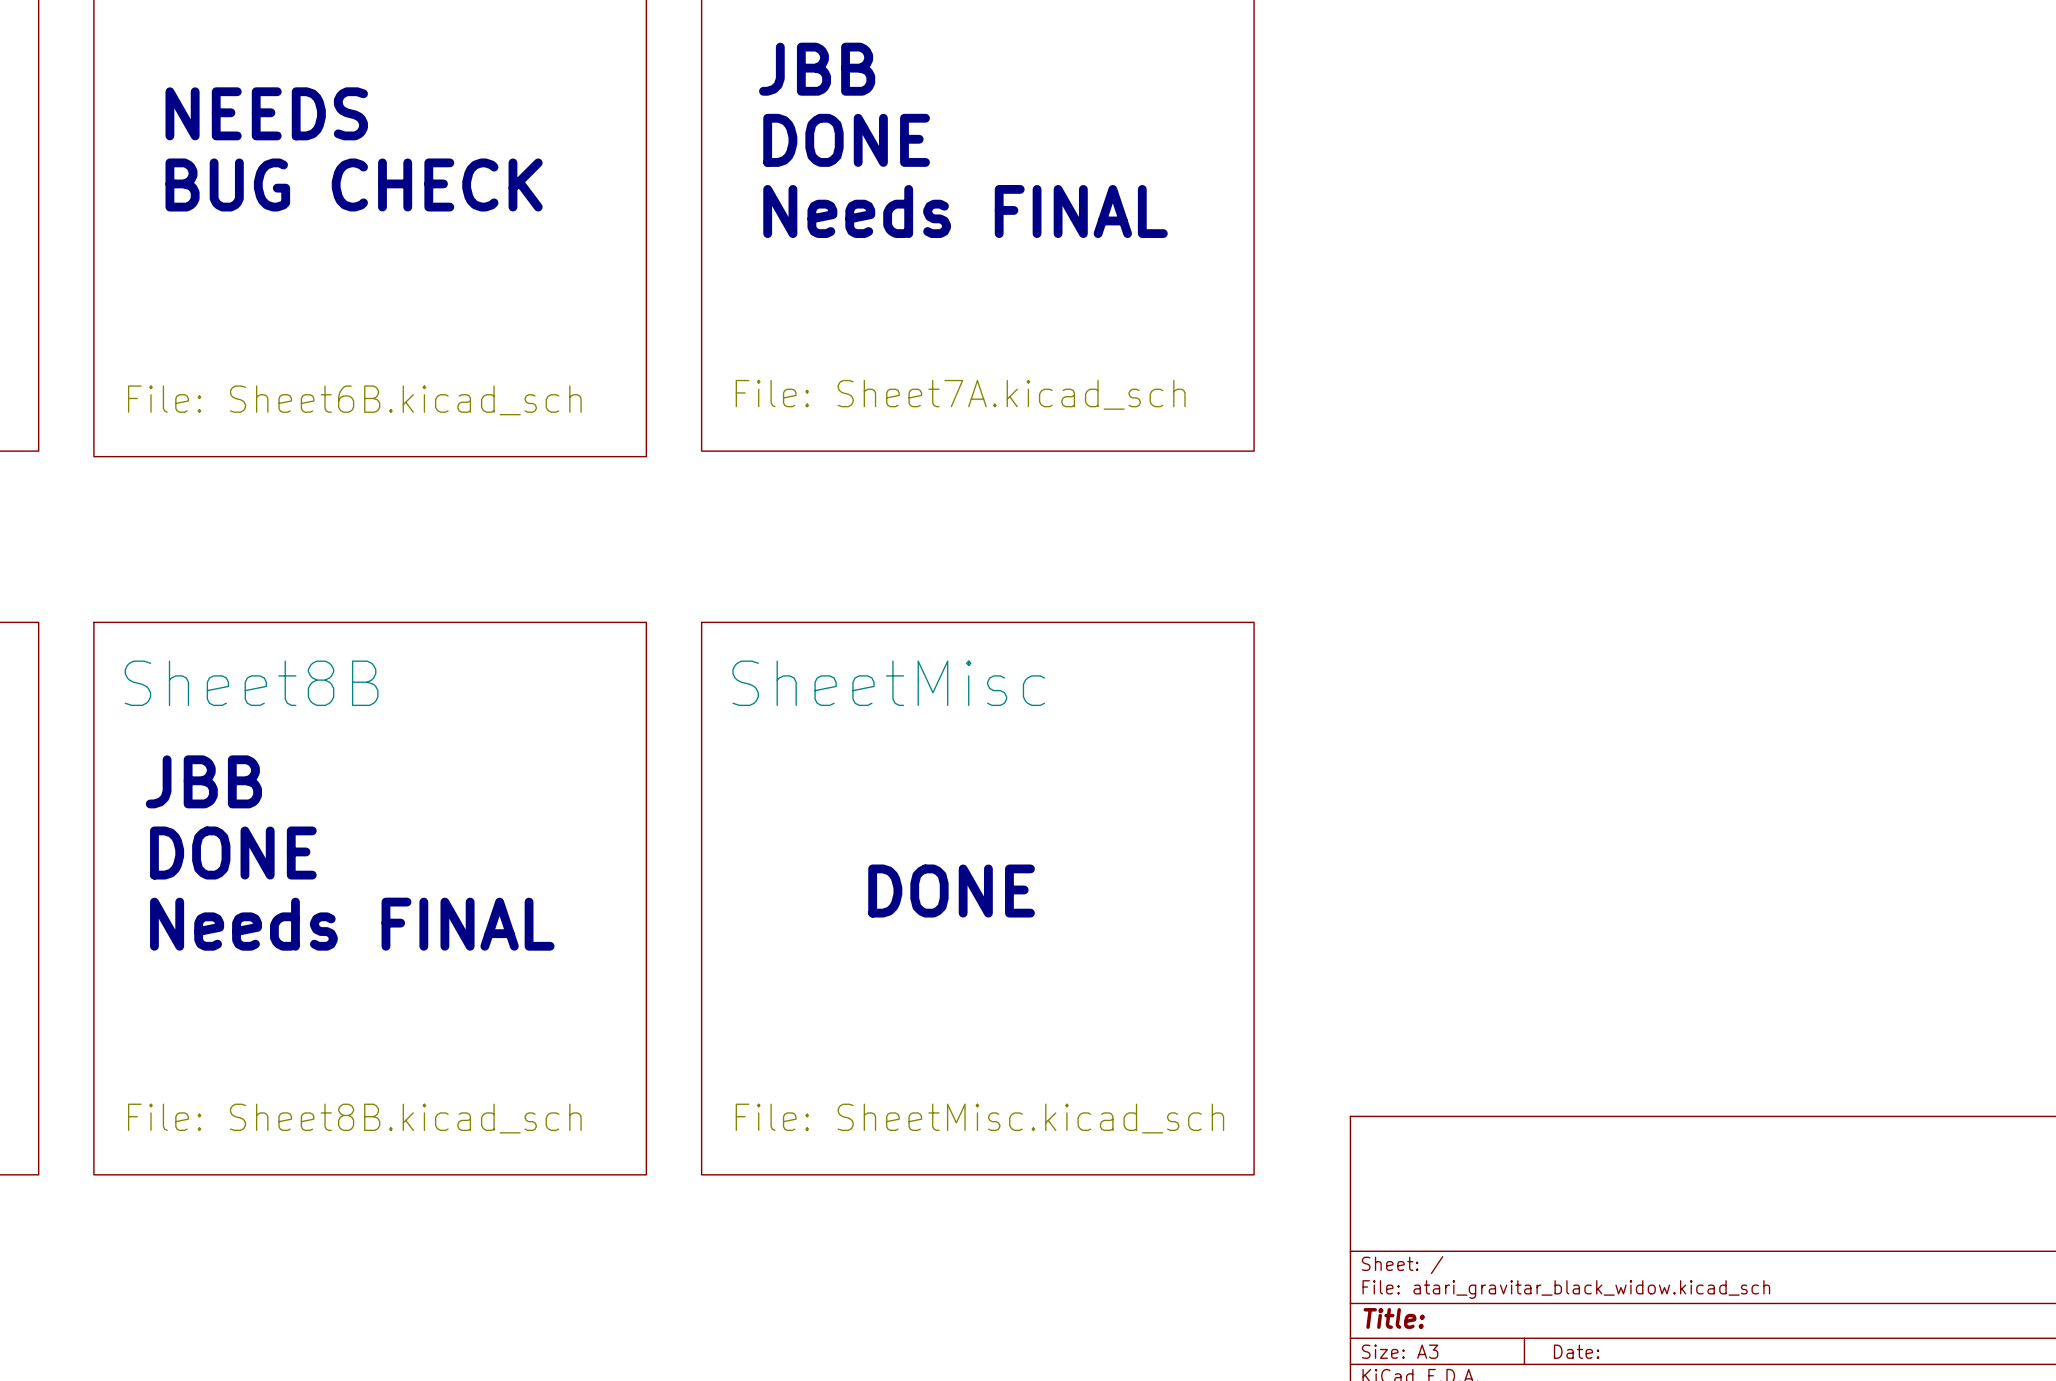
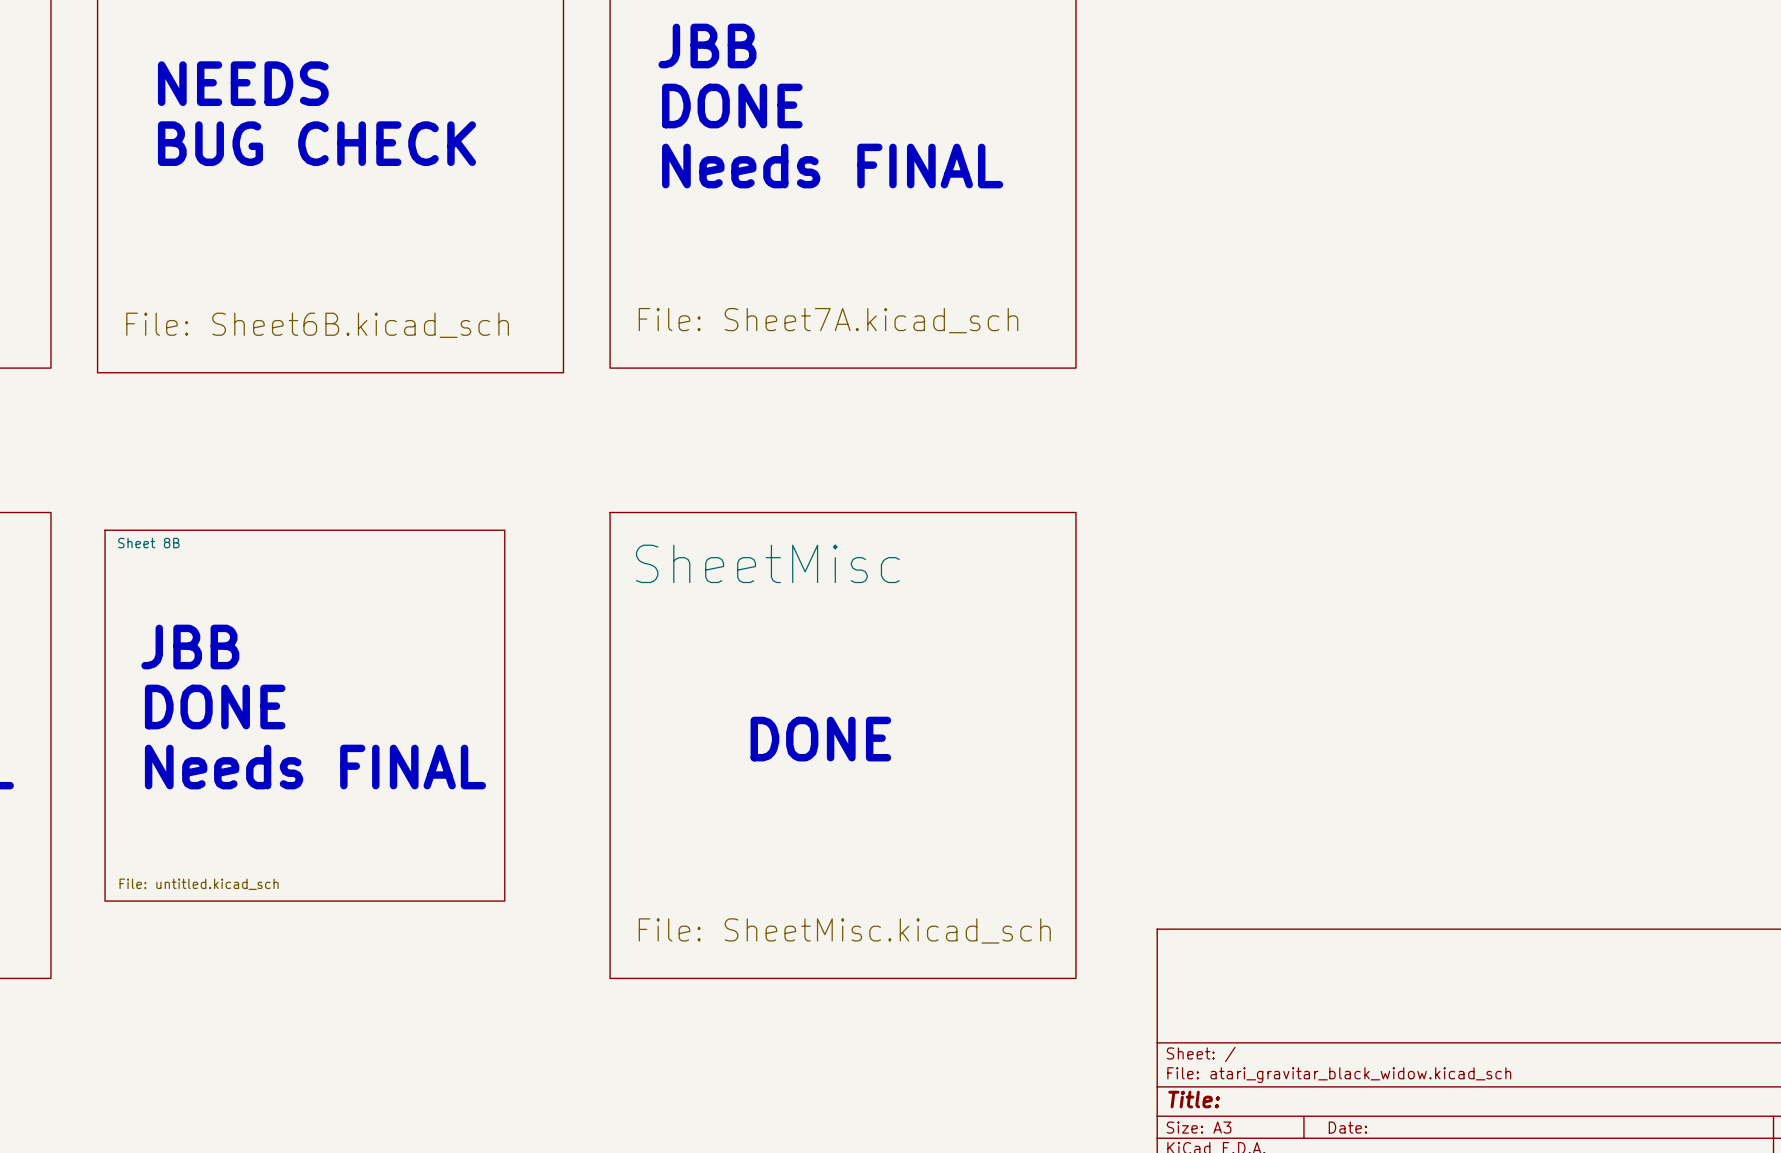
sheet Sheet 8B: none -> File: untitled.kicad_sch (304, 715)
sheet Sheet8B: File: Sheet8B.kicad_sch (370, 898) -> none

